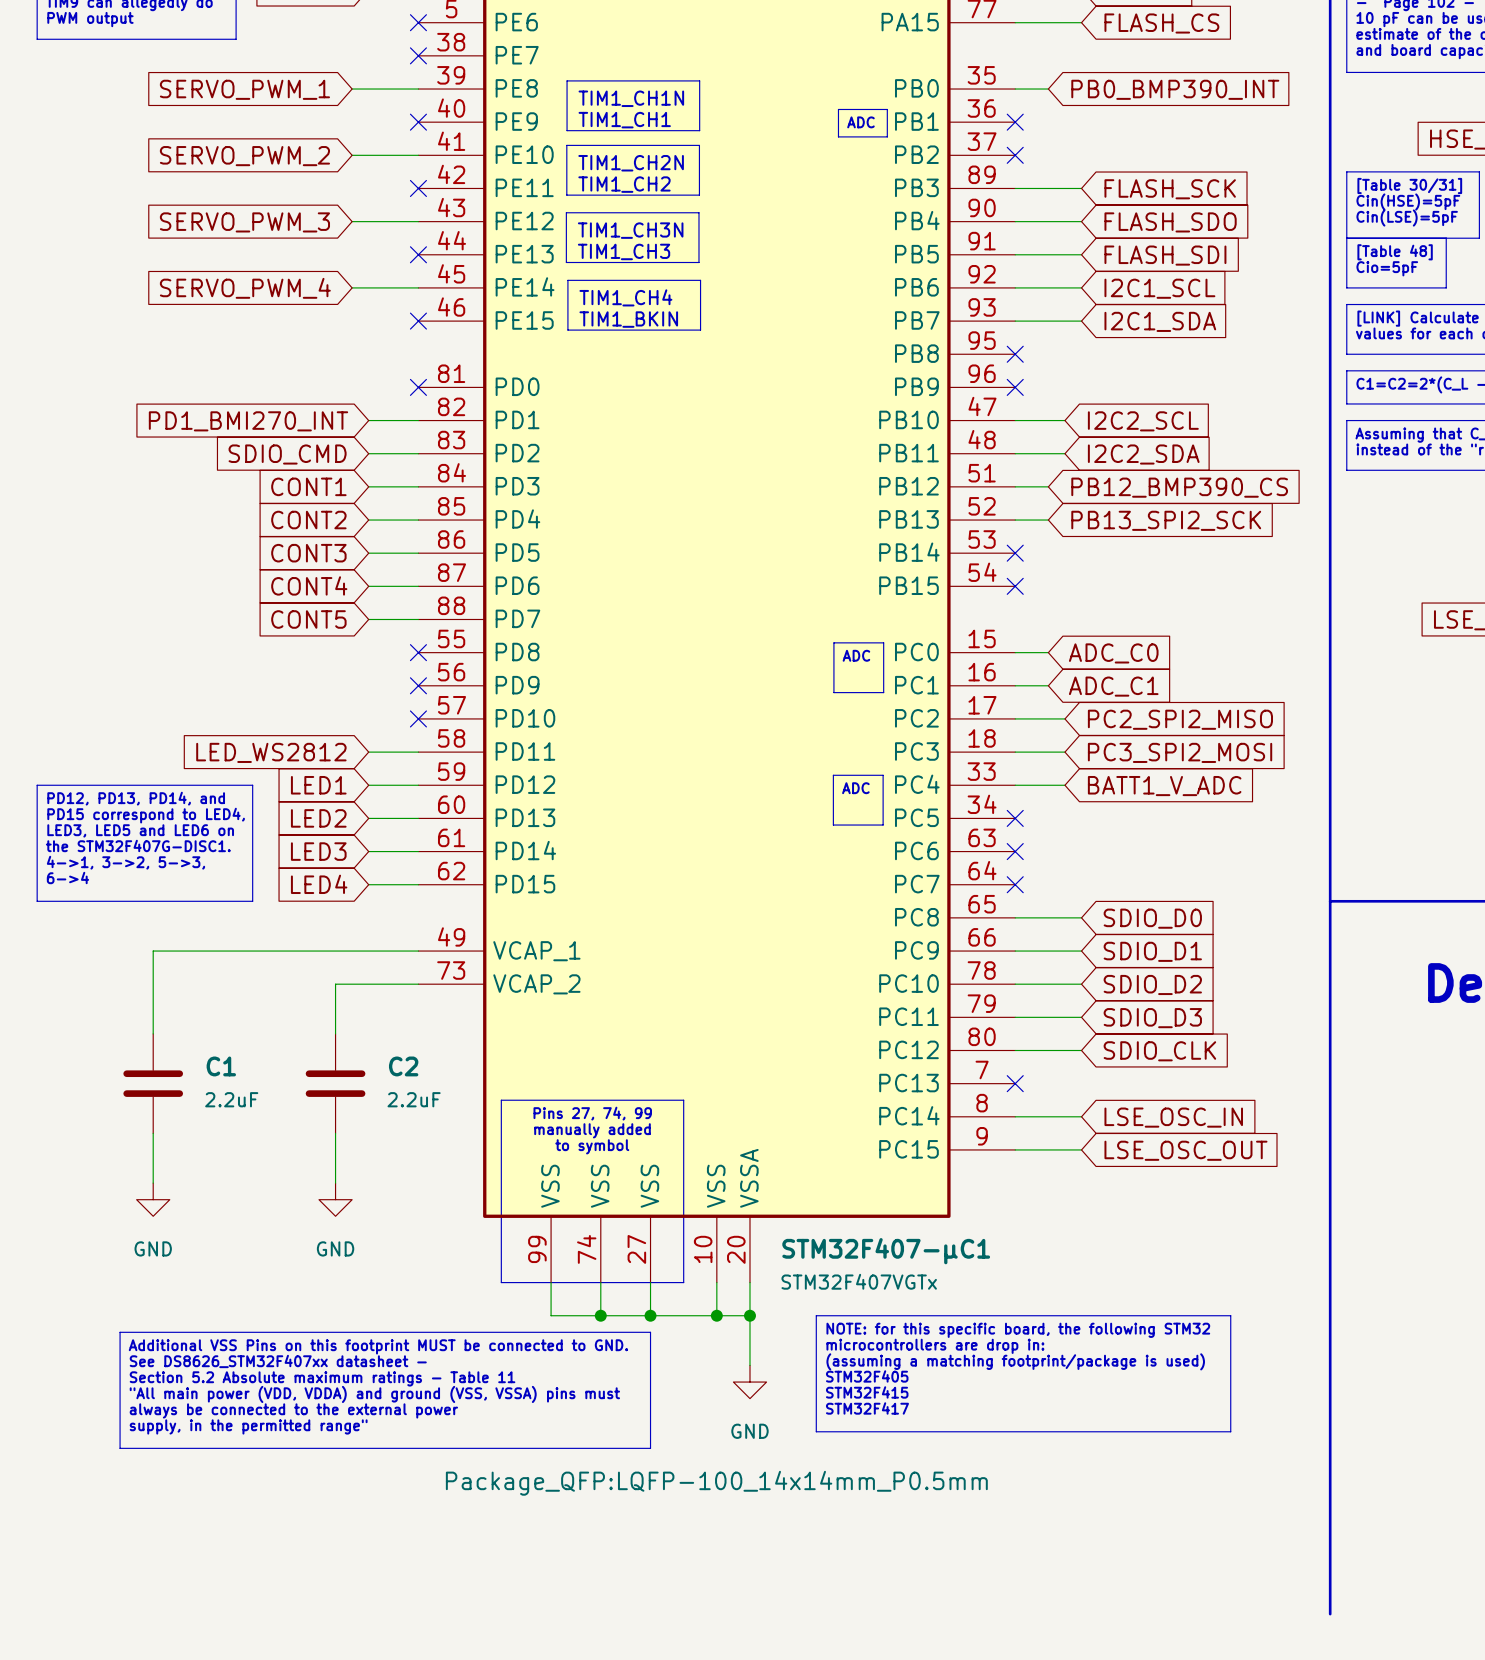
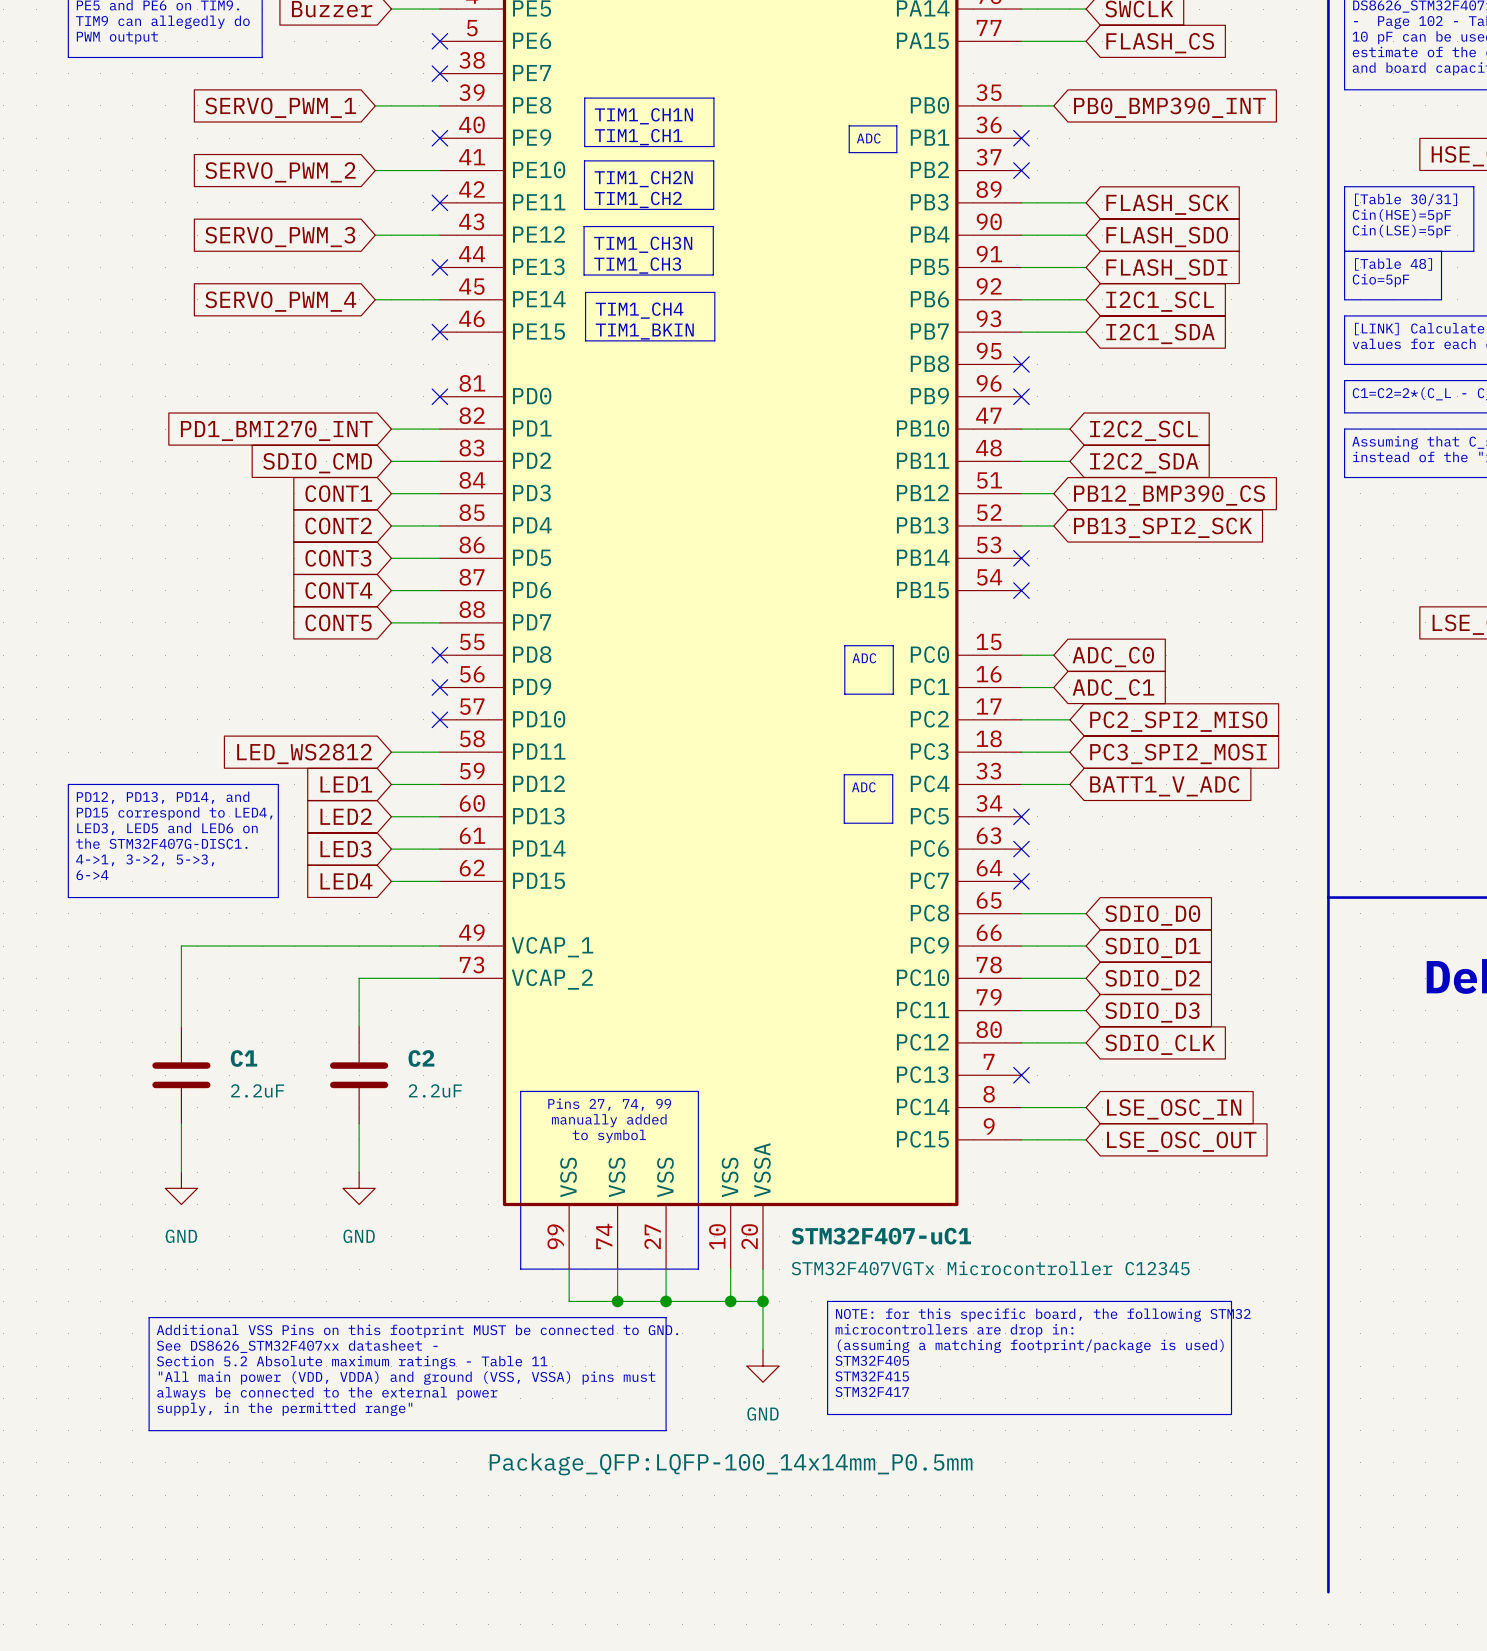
STM32F407-µC1 name: STM32F407-µC1 (886, 1251) -> STM32F407-uC1 (881, 1236)
STM32F407-µC1 value: STM32F407VGTx (859, 1281) -> STM32F407VGTx Microcontroller C12345 (990, 1268)

